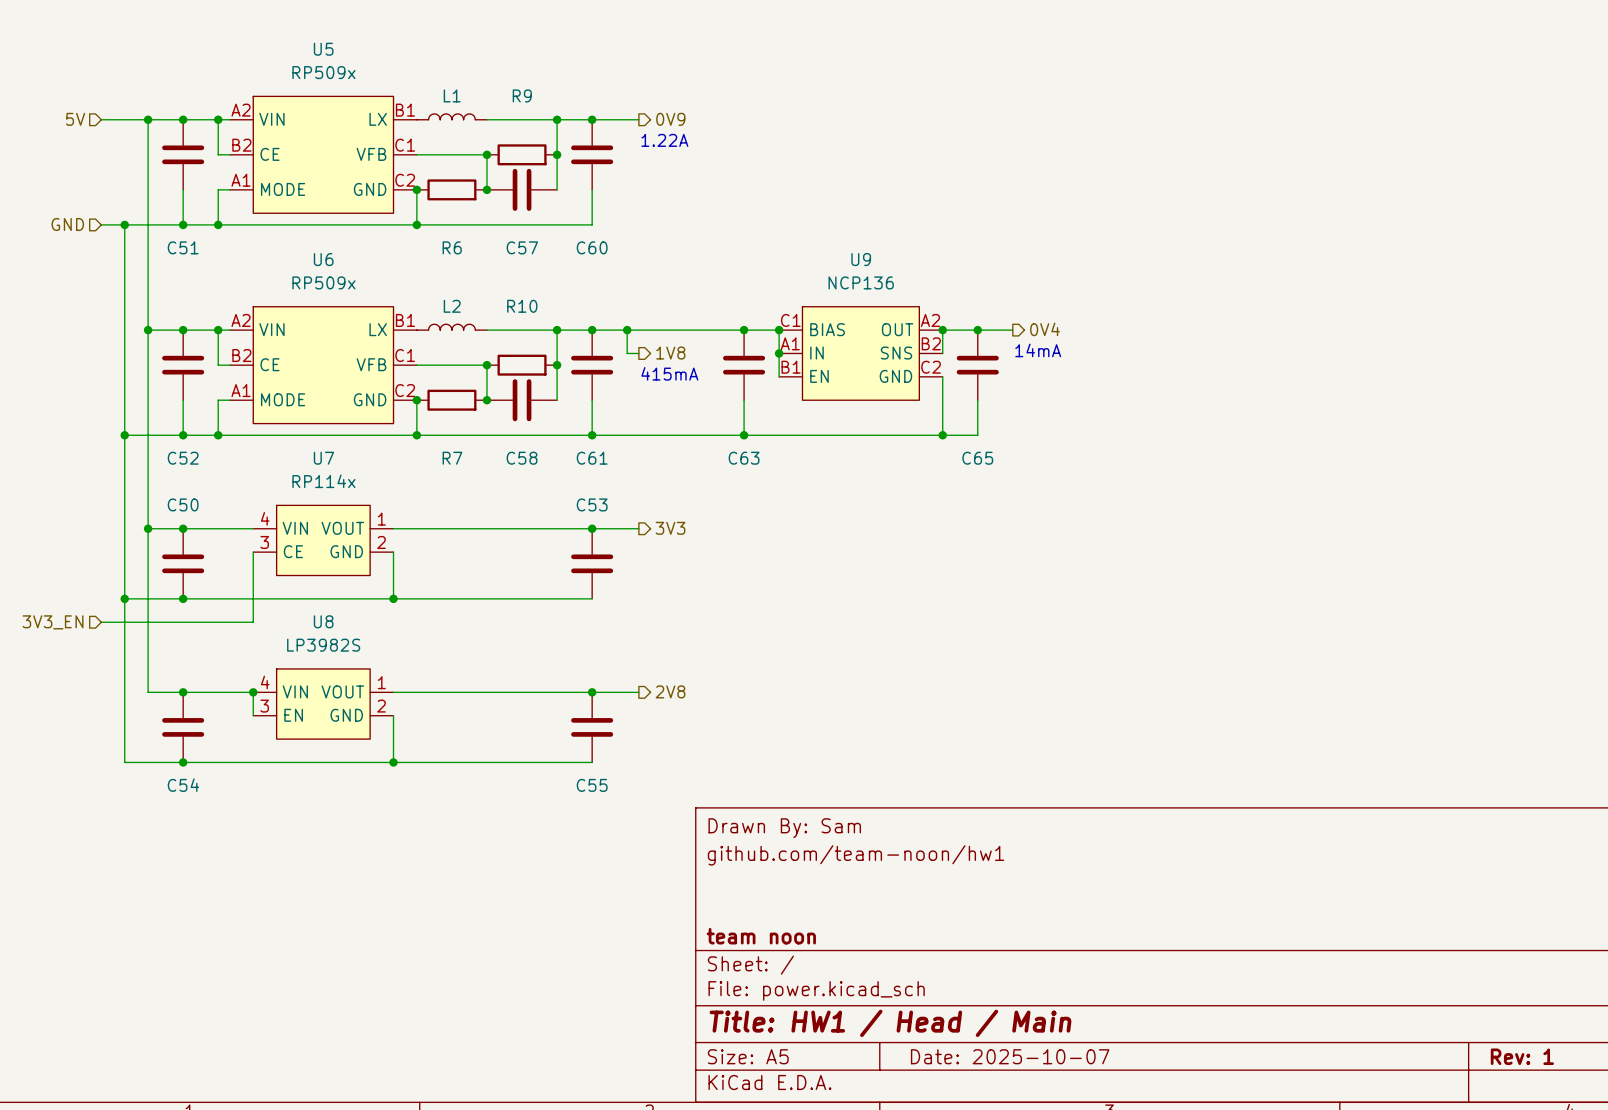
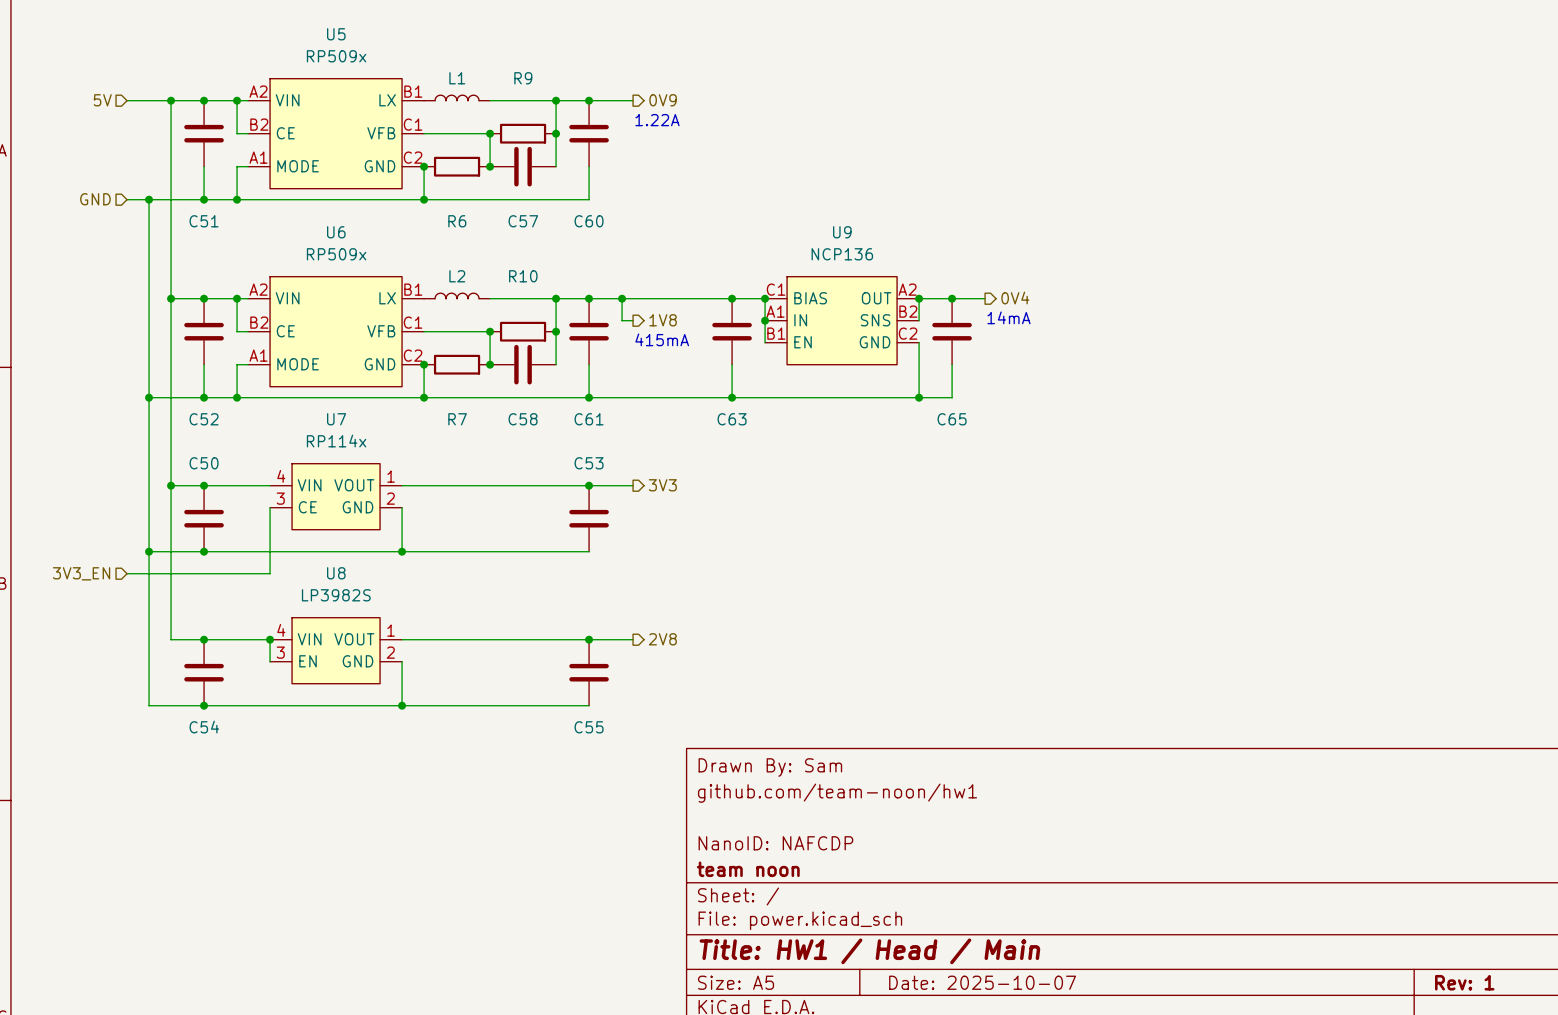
title block: none -> NanoID: NAFCDP (775, 843)

